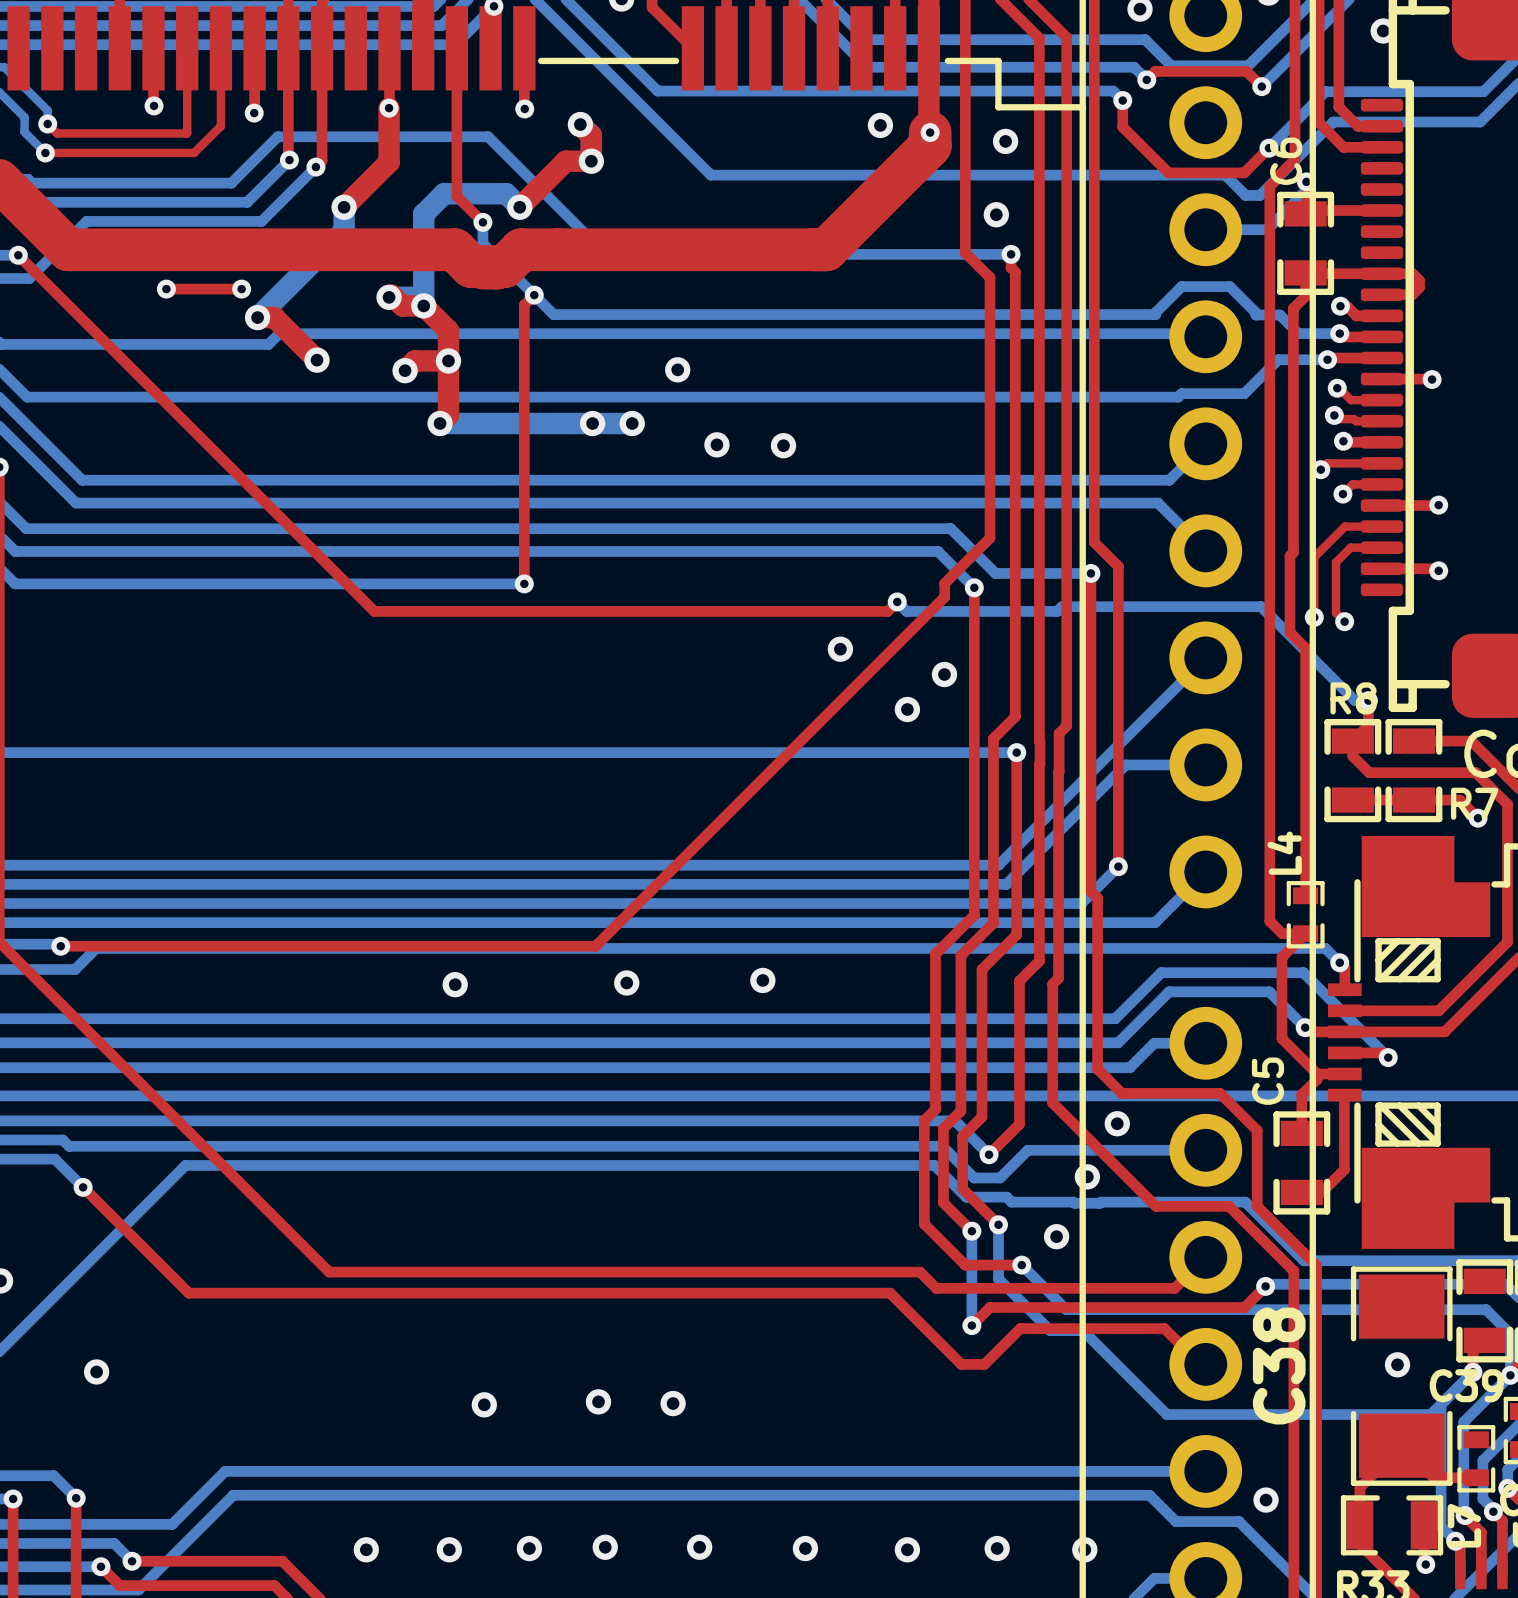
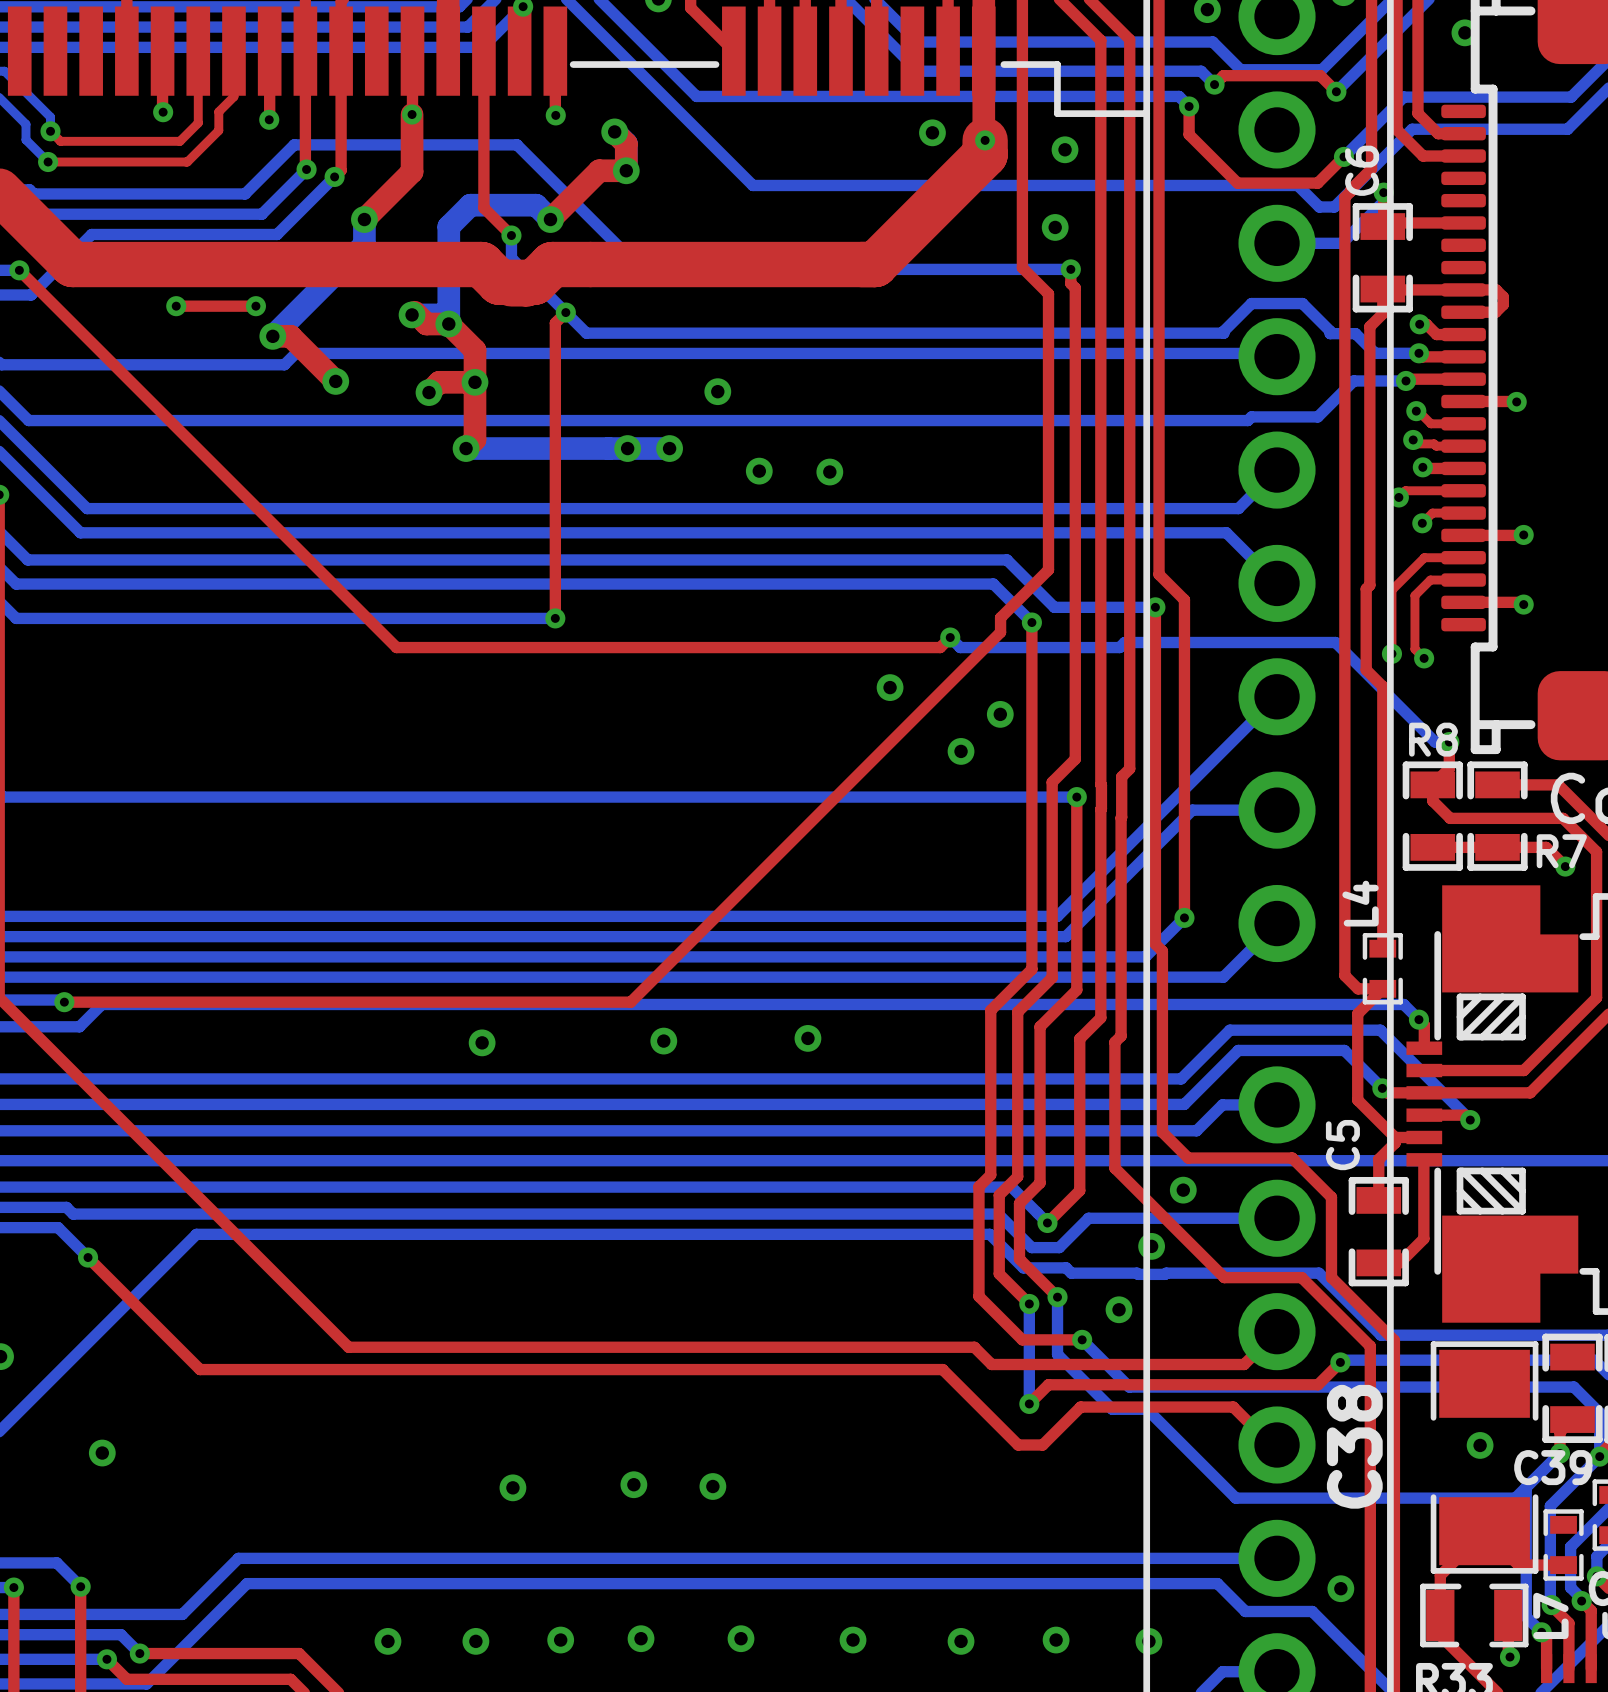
top track: (220, 91) (220, 126) (194, 152) (176, 152) -> (233, 96) (218, 111) (218, 130) (187, 162)
top track: (187, 116) (187, 133) -> none
top track: (169, 133) (186, 133) -> (179, 141) (198, 123)

